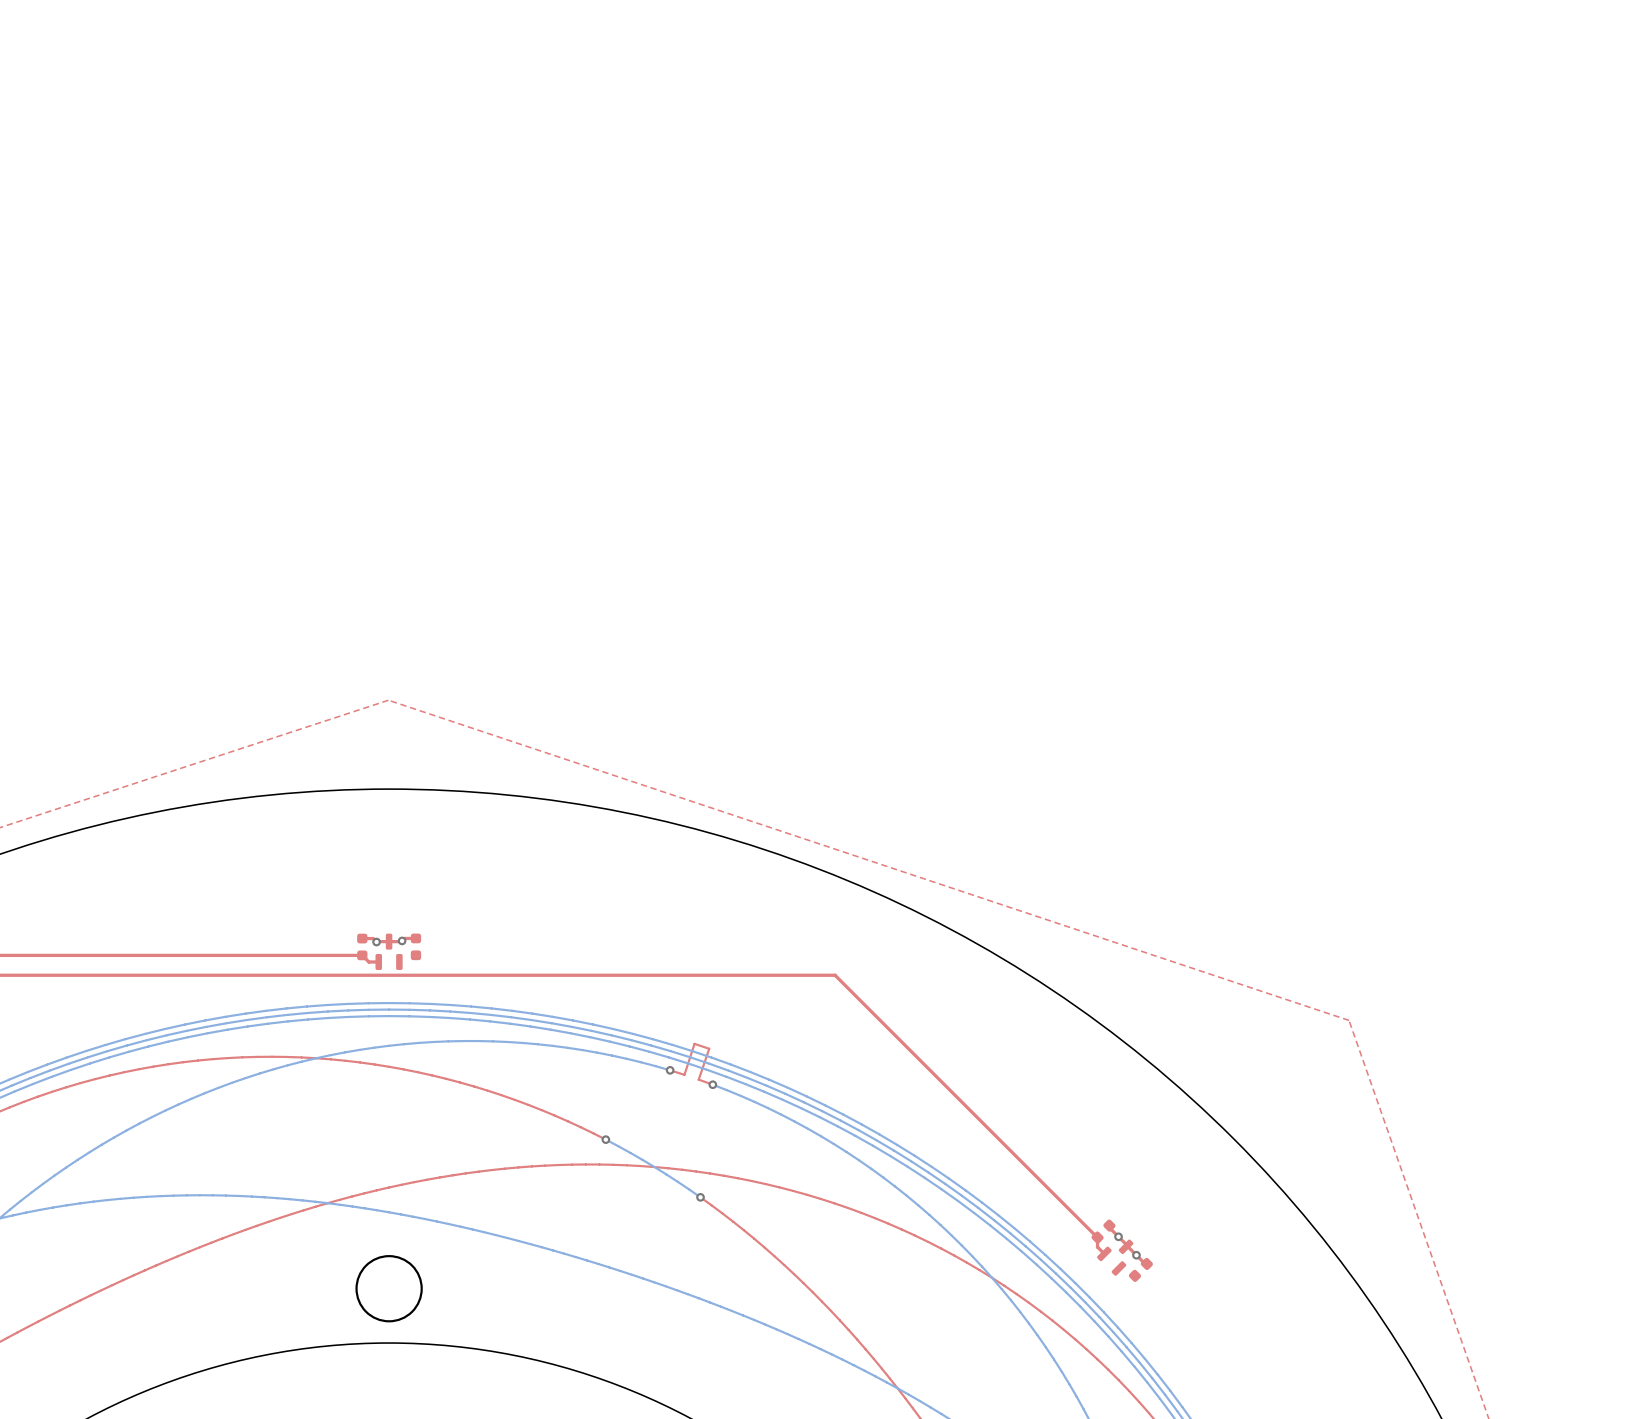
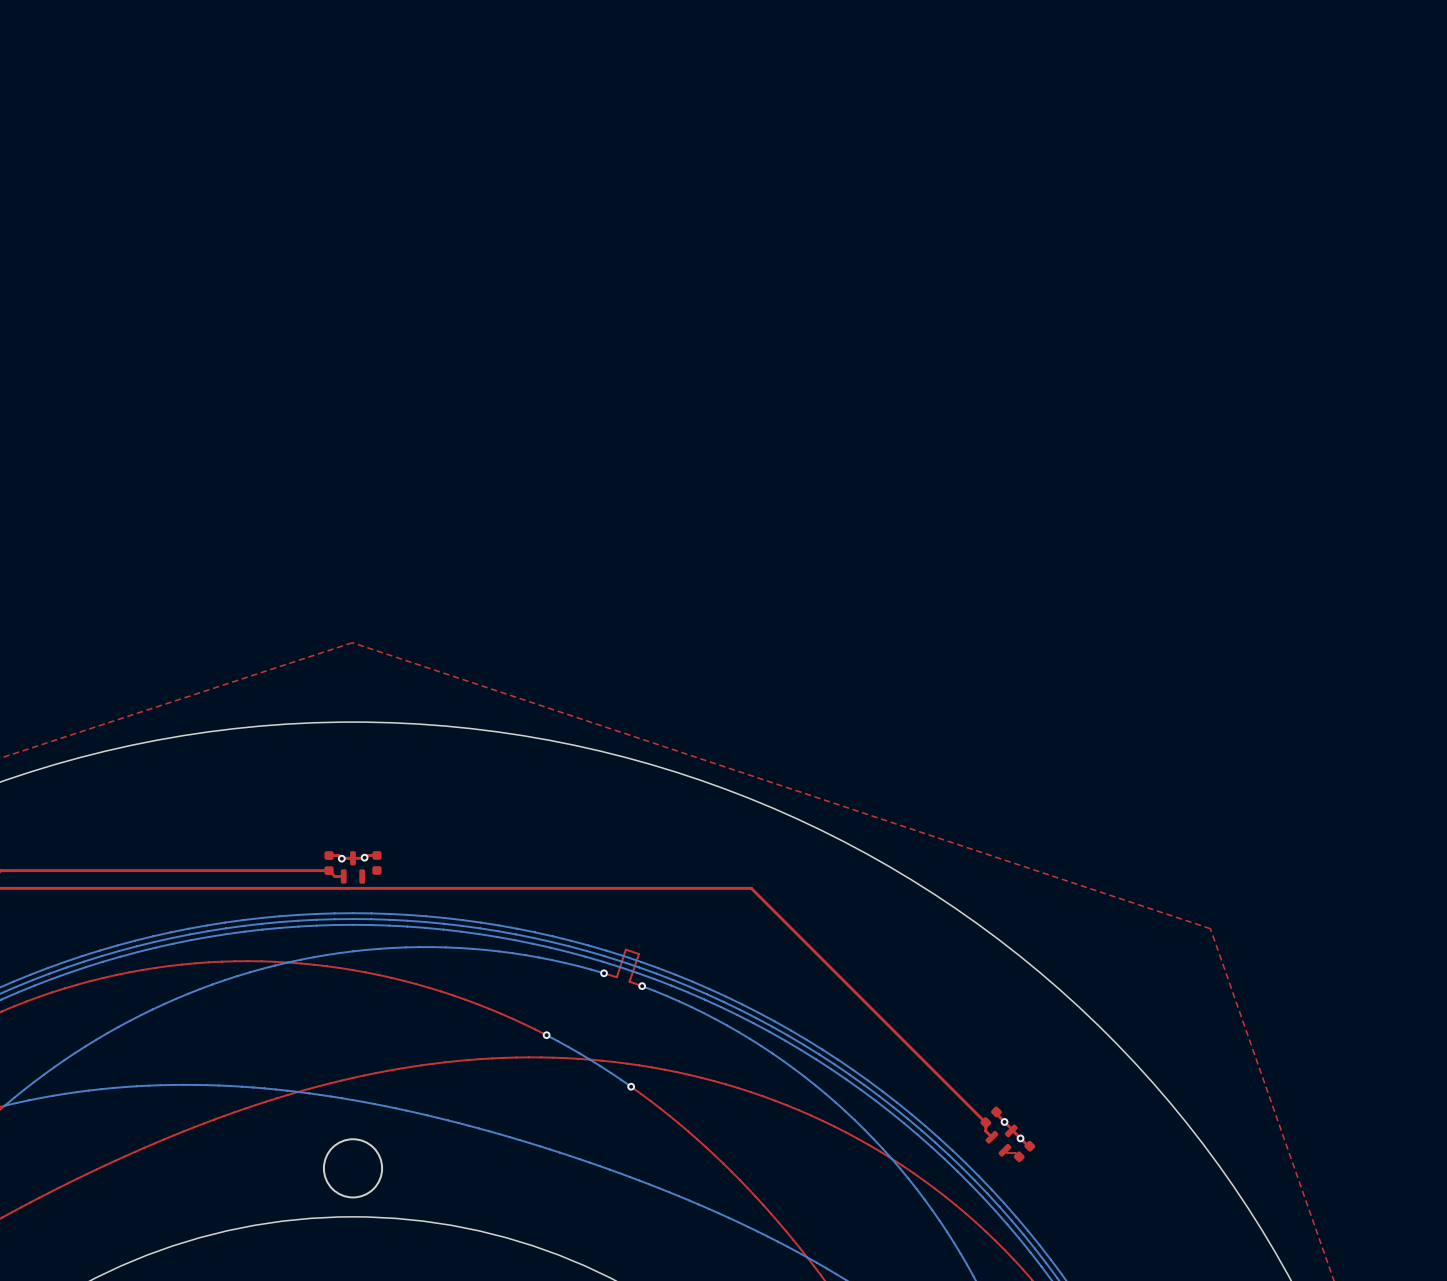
top track: none -> (1004, 1150) (1007, 1153) (1015, 1153) (1019, 1156)

